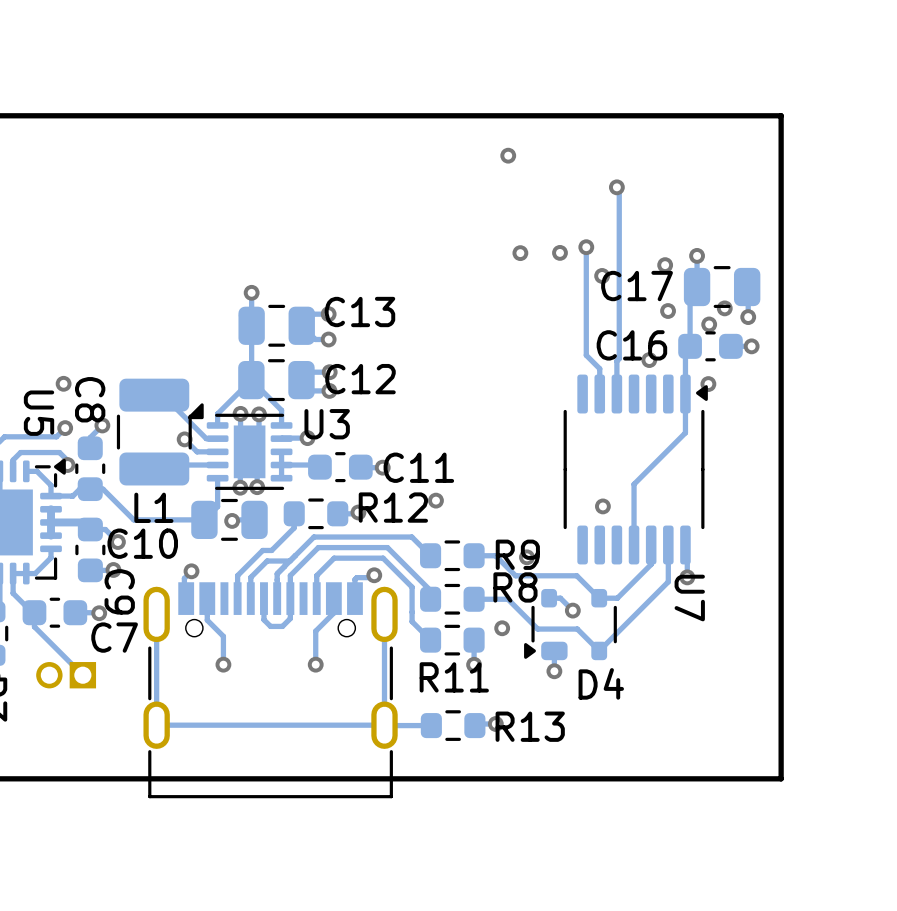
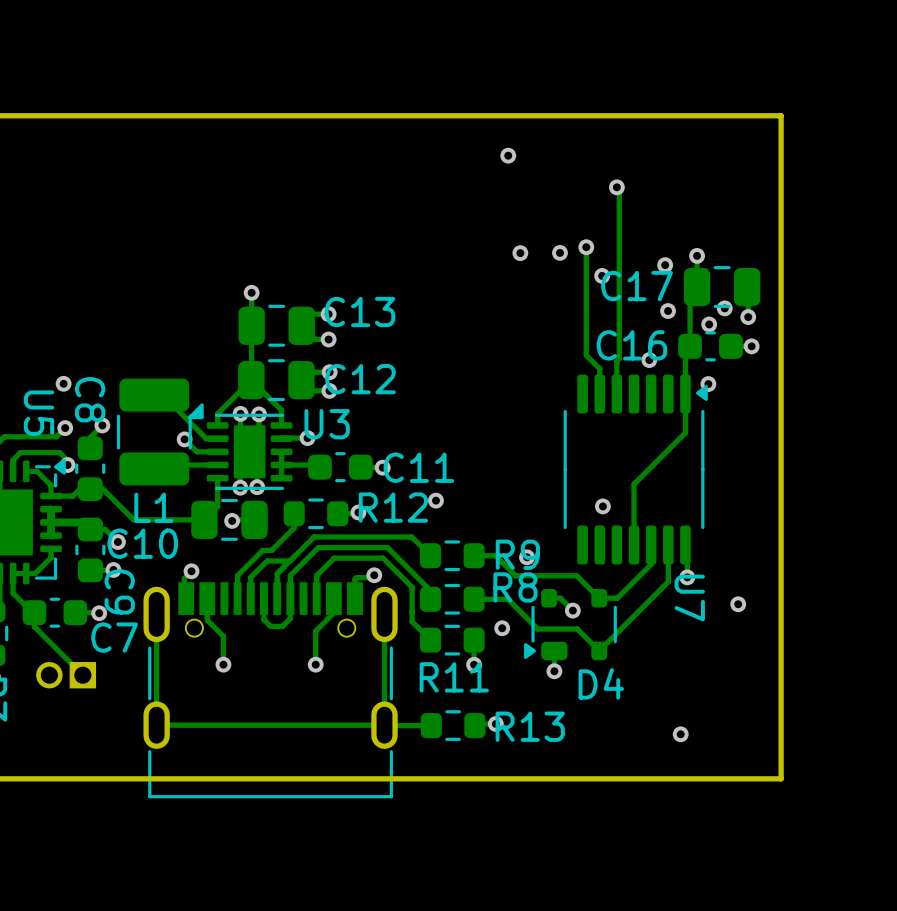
via: none -> (738, 604)
via: none -> (680, 734)

